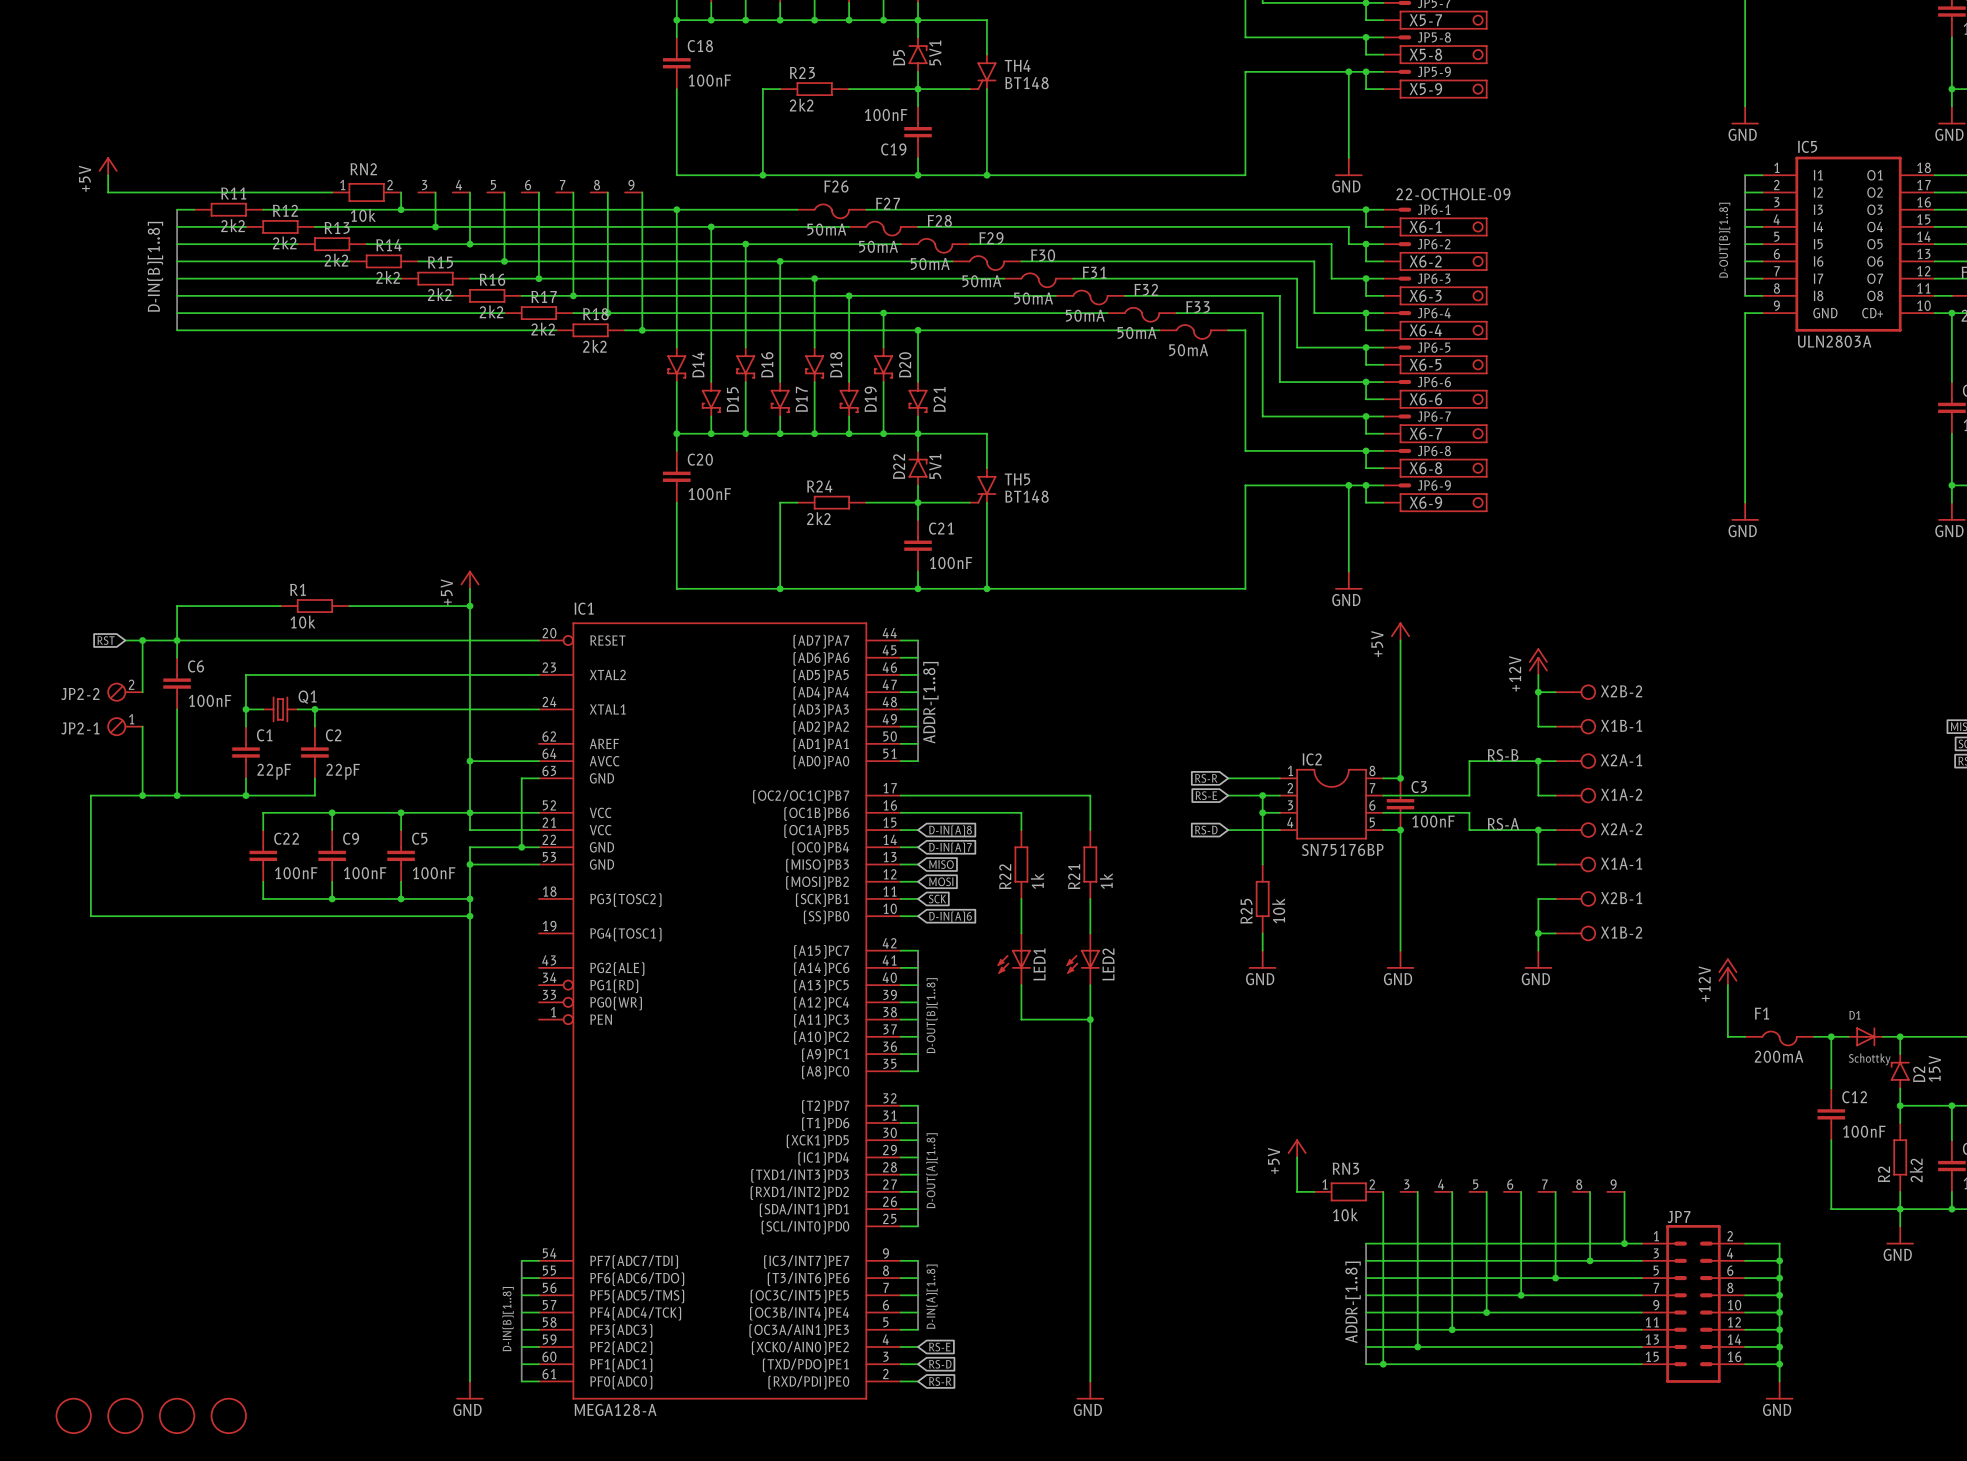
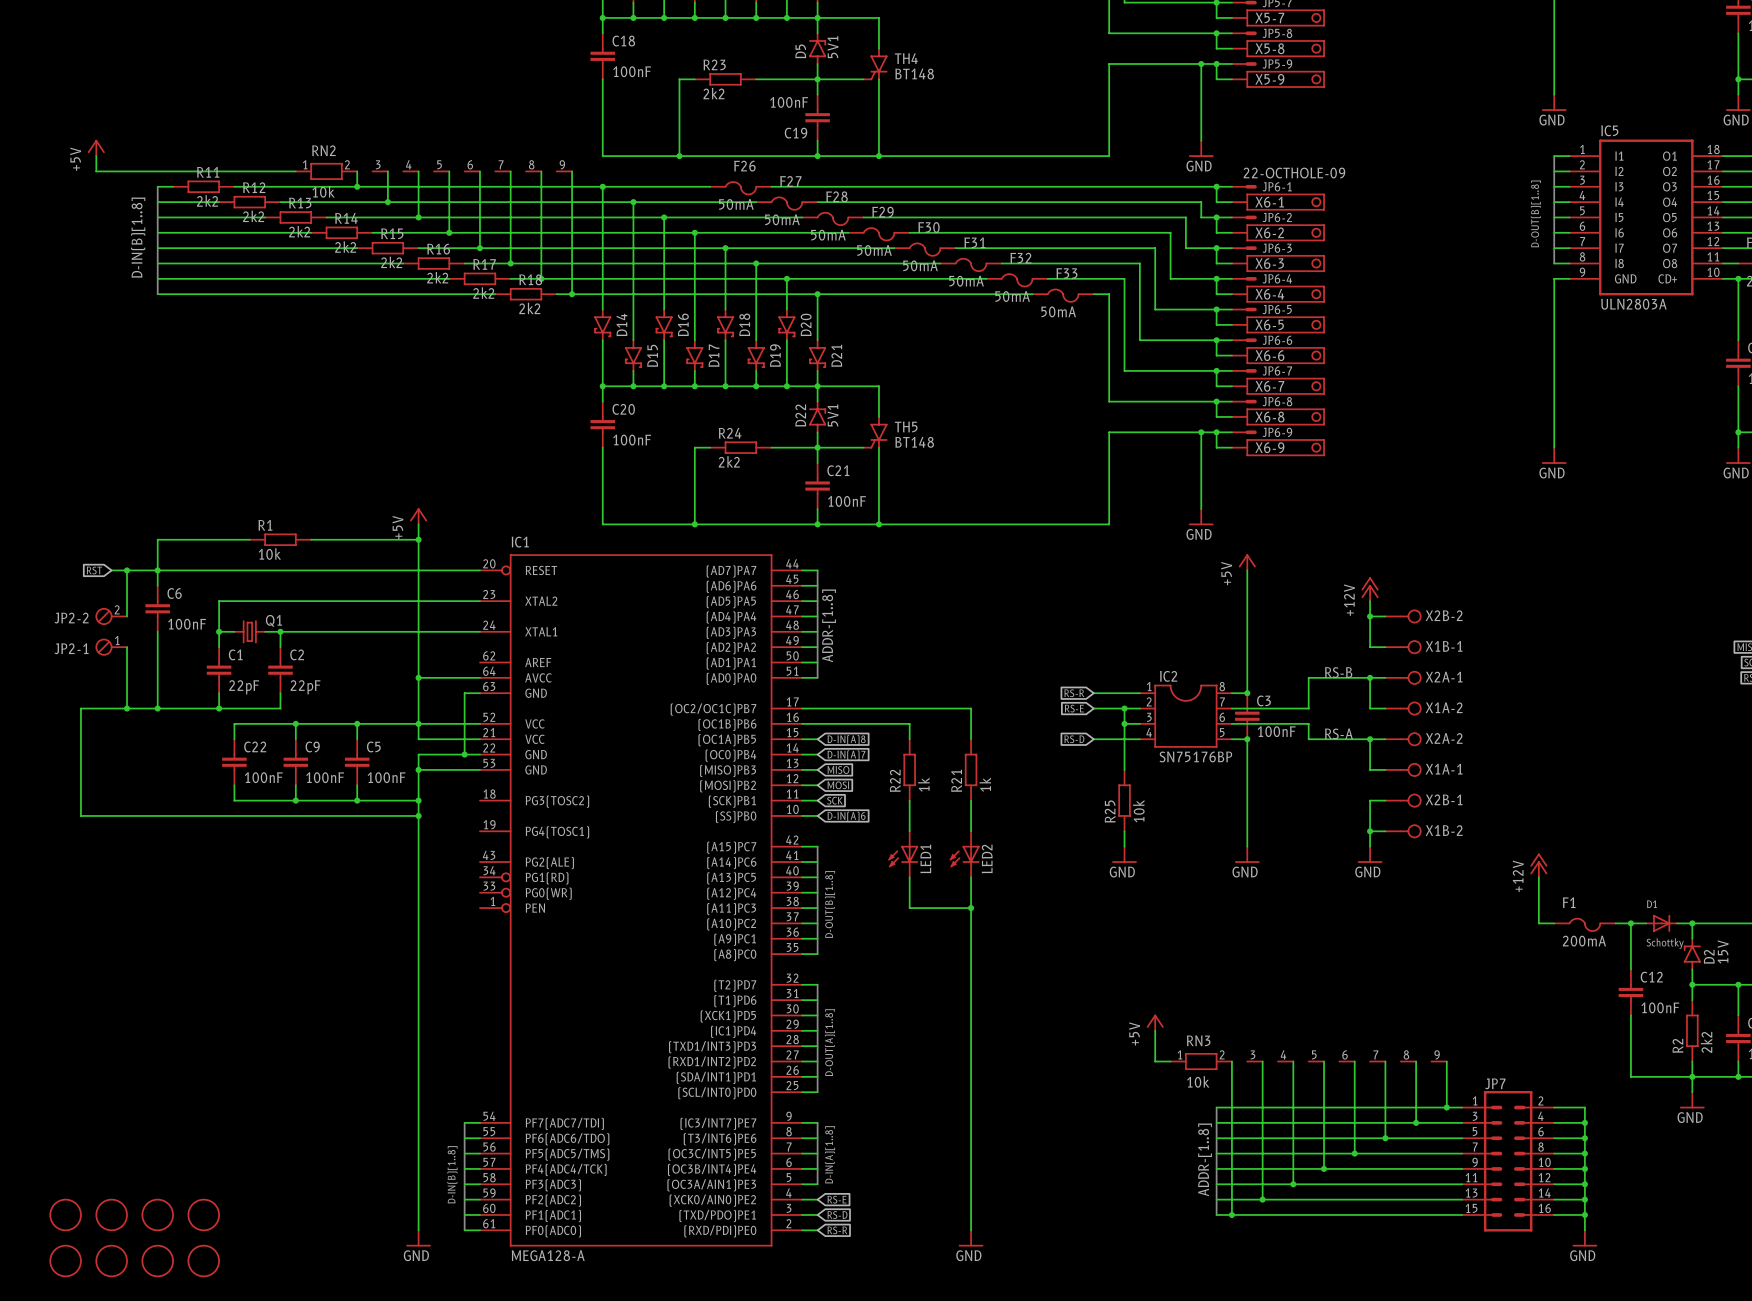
part: none -> (65, 1214)
part: none -> (111, 1214)
part: none -> (157, 1214)
part: none -> (203, 1214)

